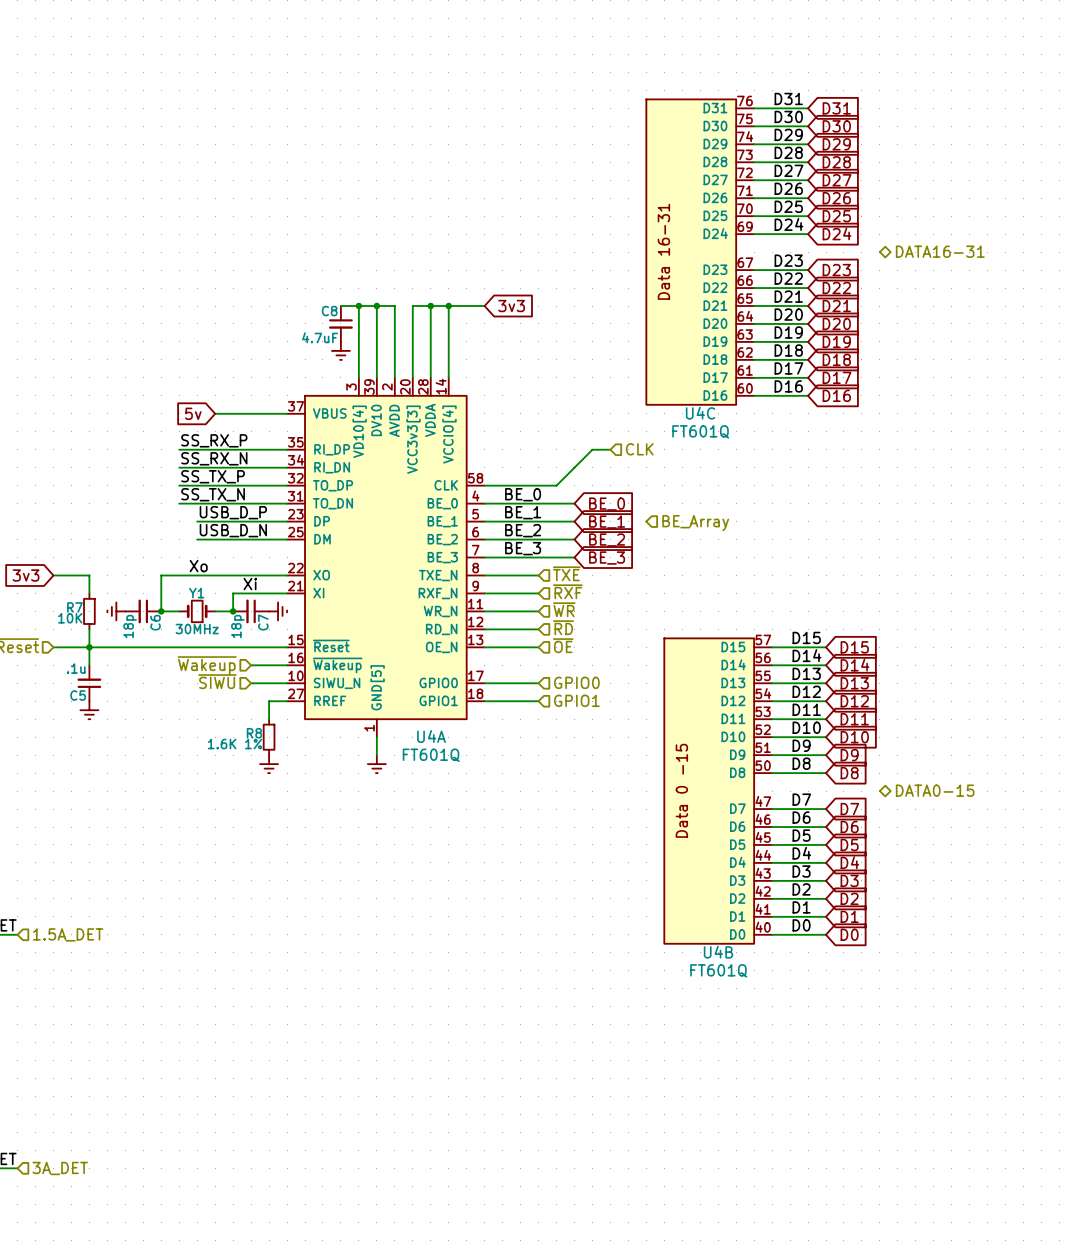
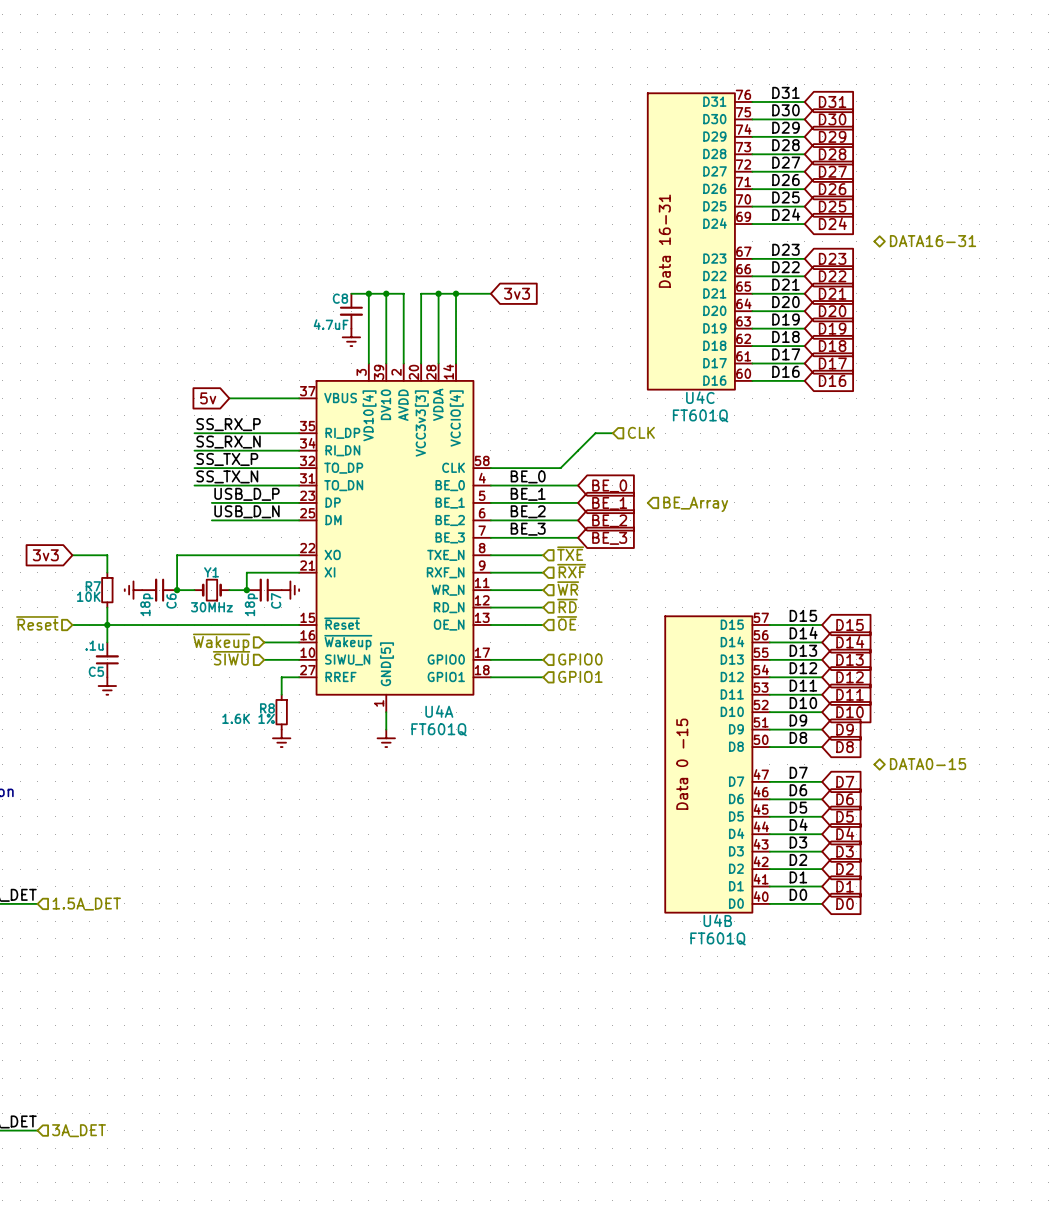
label: Xo (198, 566) -> none
label: Xi (250, 584) -> none

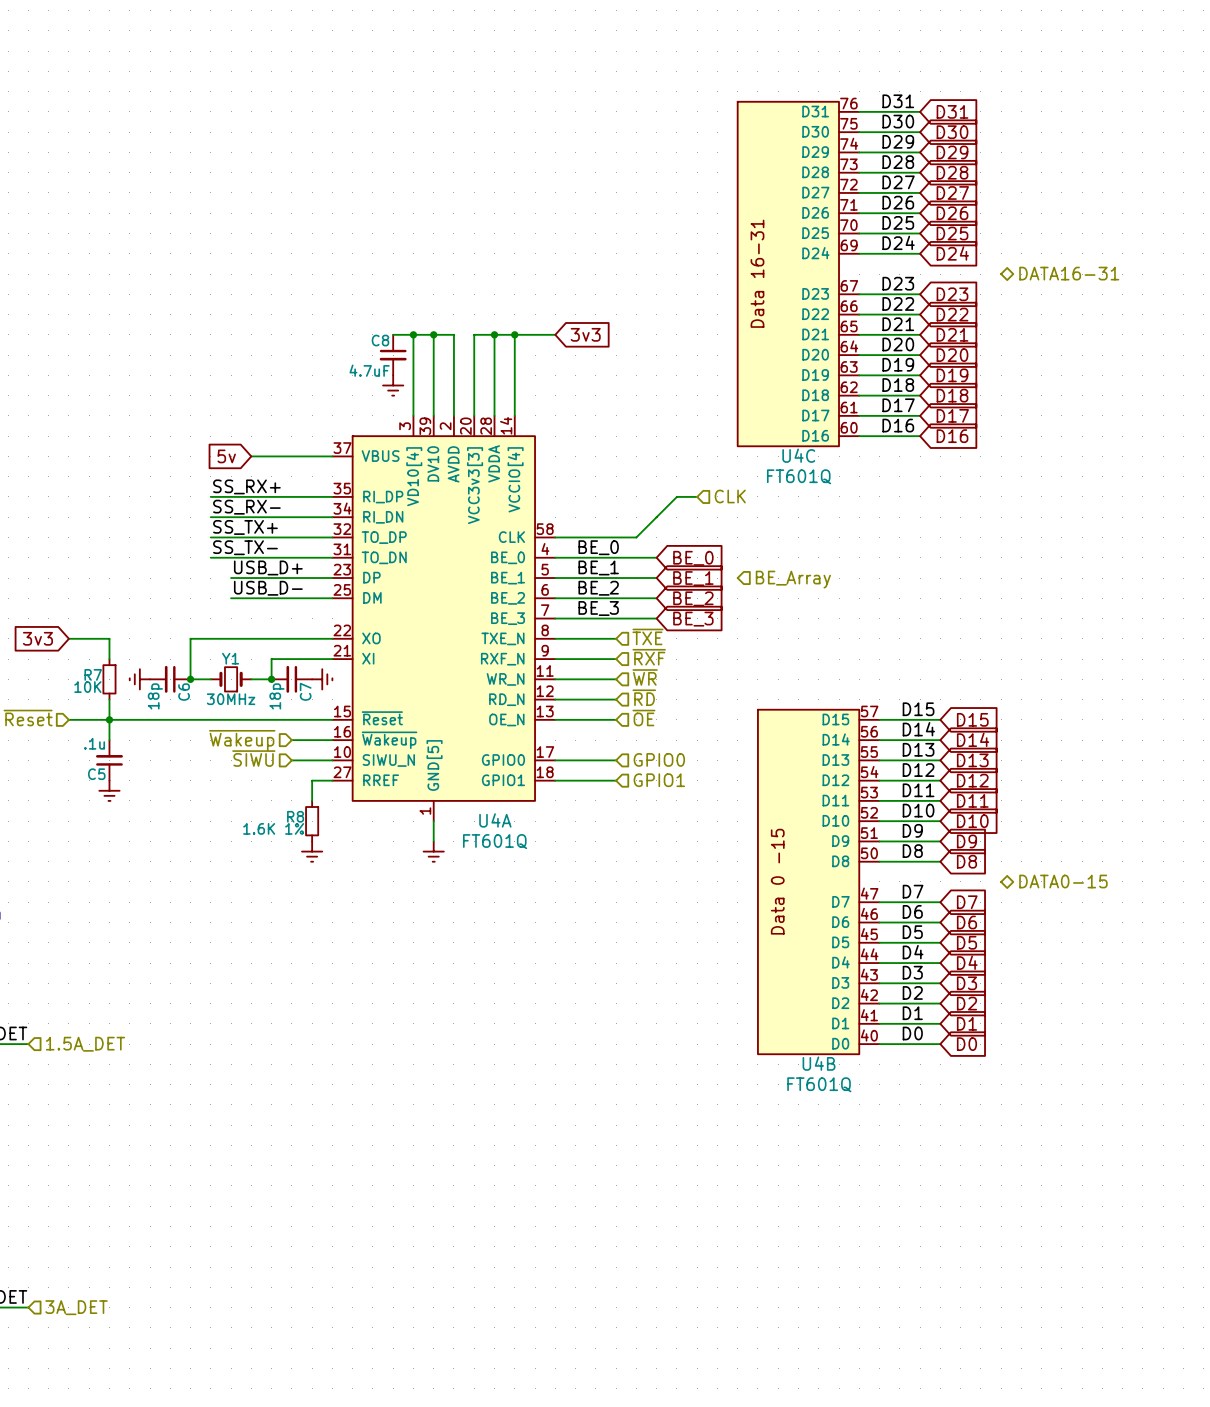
label: SS_RX_P (228, 424) -> SS_RX+ (246, 486)
label: SS_RX_N (228, 442) -> SS_RX- (246, 507)
label: SS_TX_P (227, 459) -> SS_TX+ (245, 527)
label: SS_TX_N (227, 476) -> SS_TX- (245, 547)
label: USB_D_P (246, 494) -> USB_D+ (268, 567)
label: USB_D_N (246, 511) -> USB_D- (268, 588)

